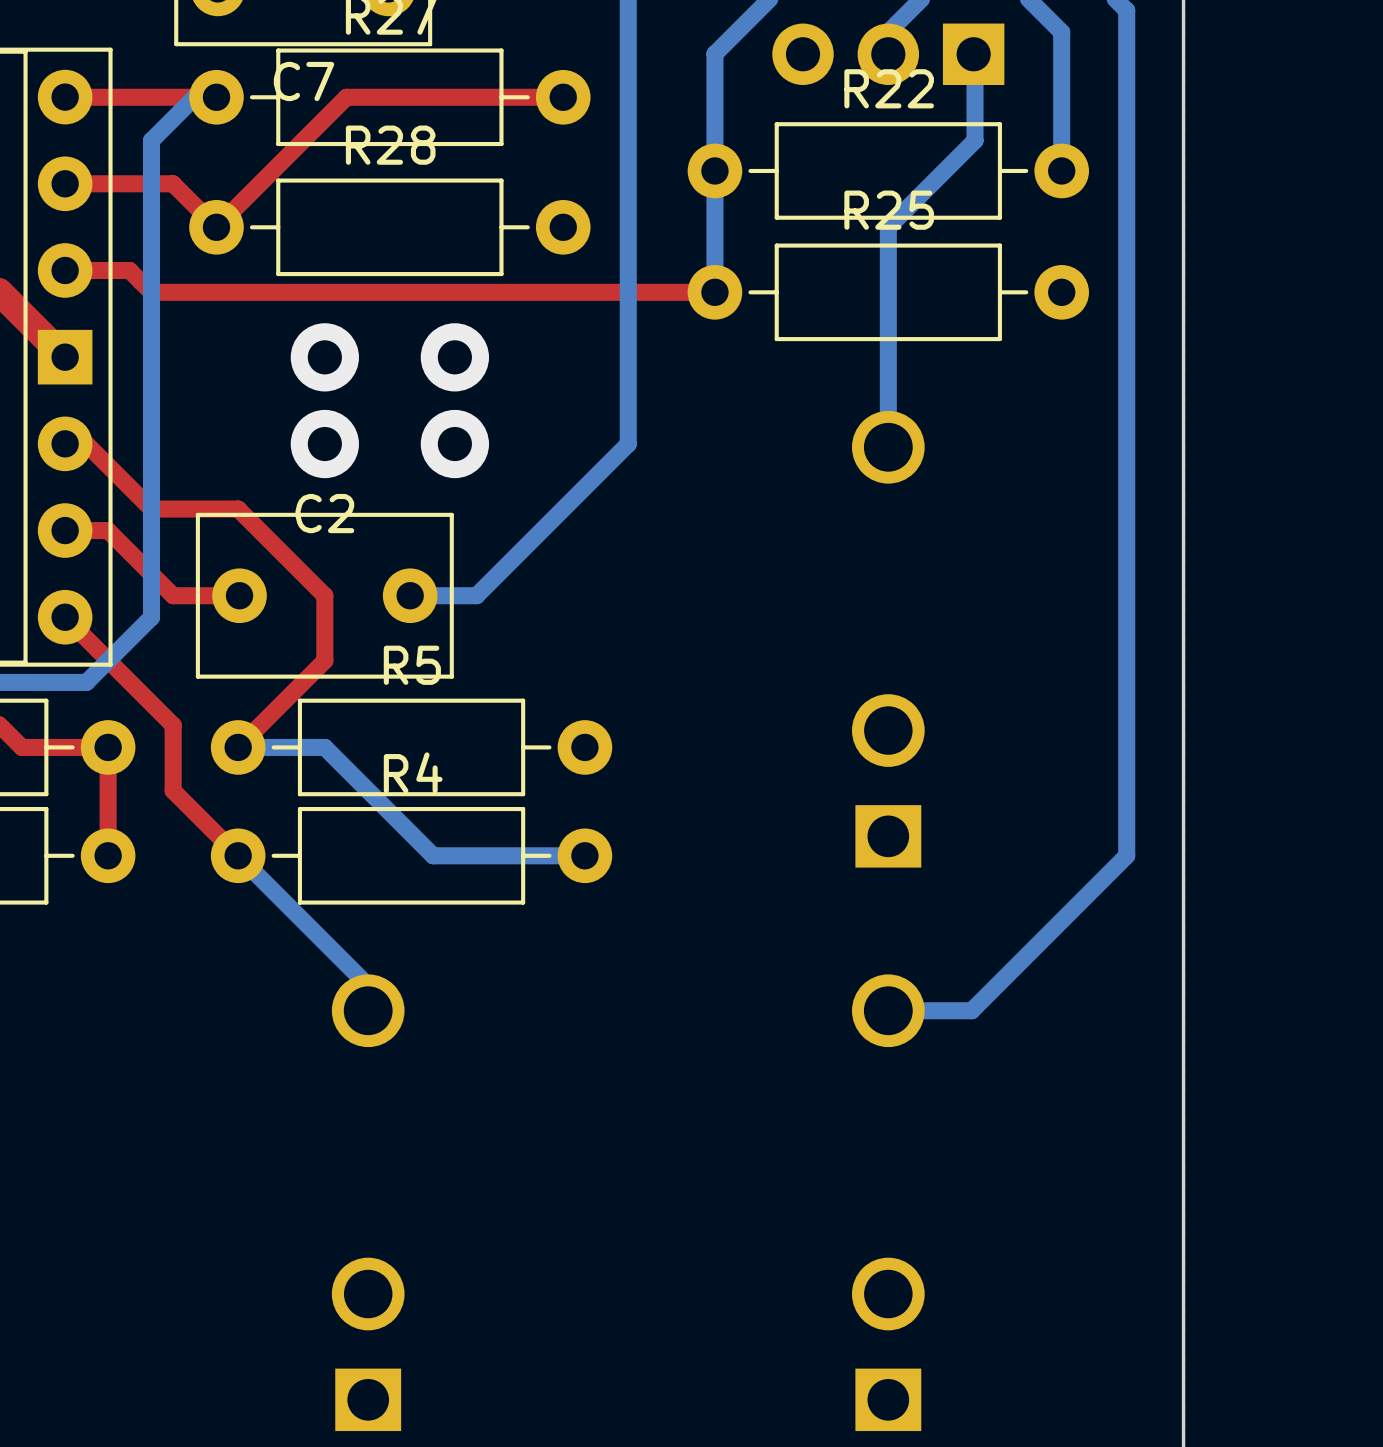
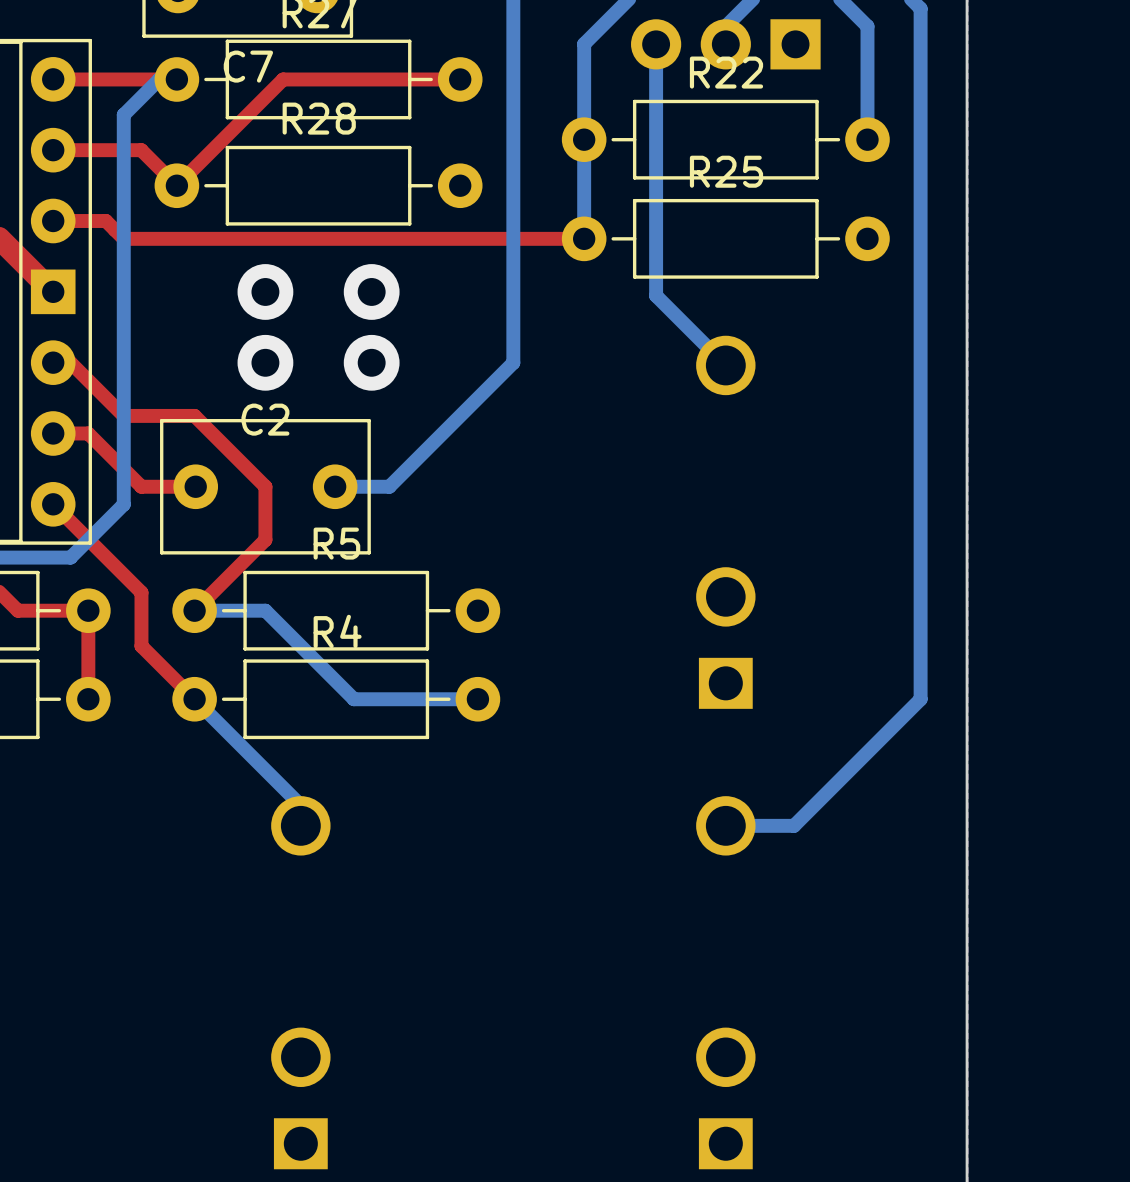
bottom track: (973, 54) (975, 140) (888, 227) (888, 447) -> (656, 44) (656, 295) (725, 365)

